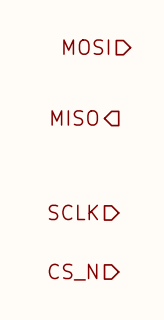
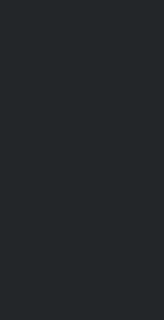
hierarchical label: MOSI (86, 47) -> none
hierarchical label: MISO (74, 117) -> none
hierarchical label: SCLK (73, 212) -> none
hierarchical label: CS_N (73, 272) -> none

